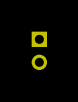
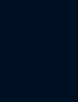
part: (39, 50) -> none

